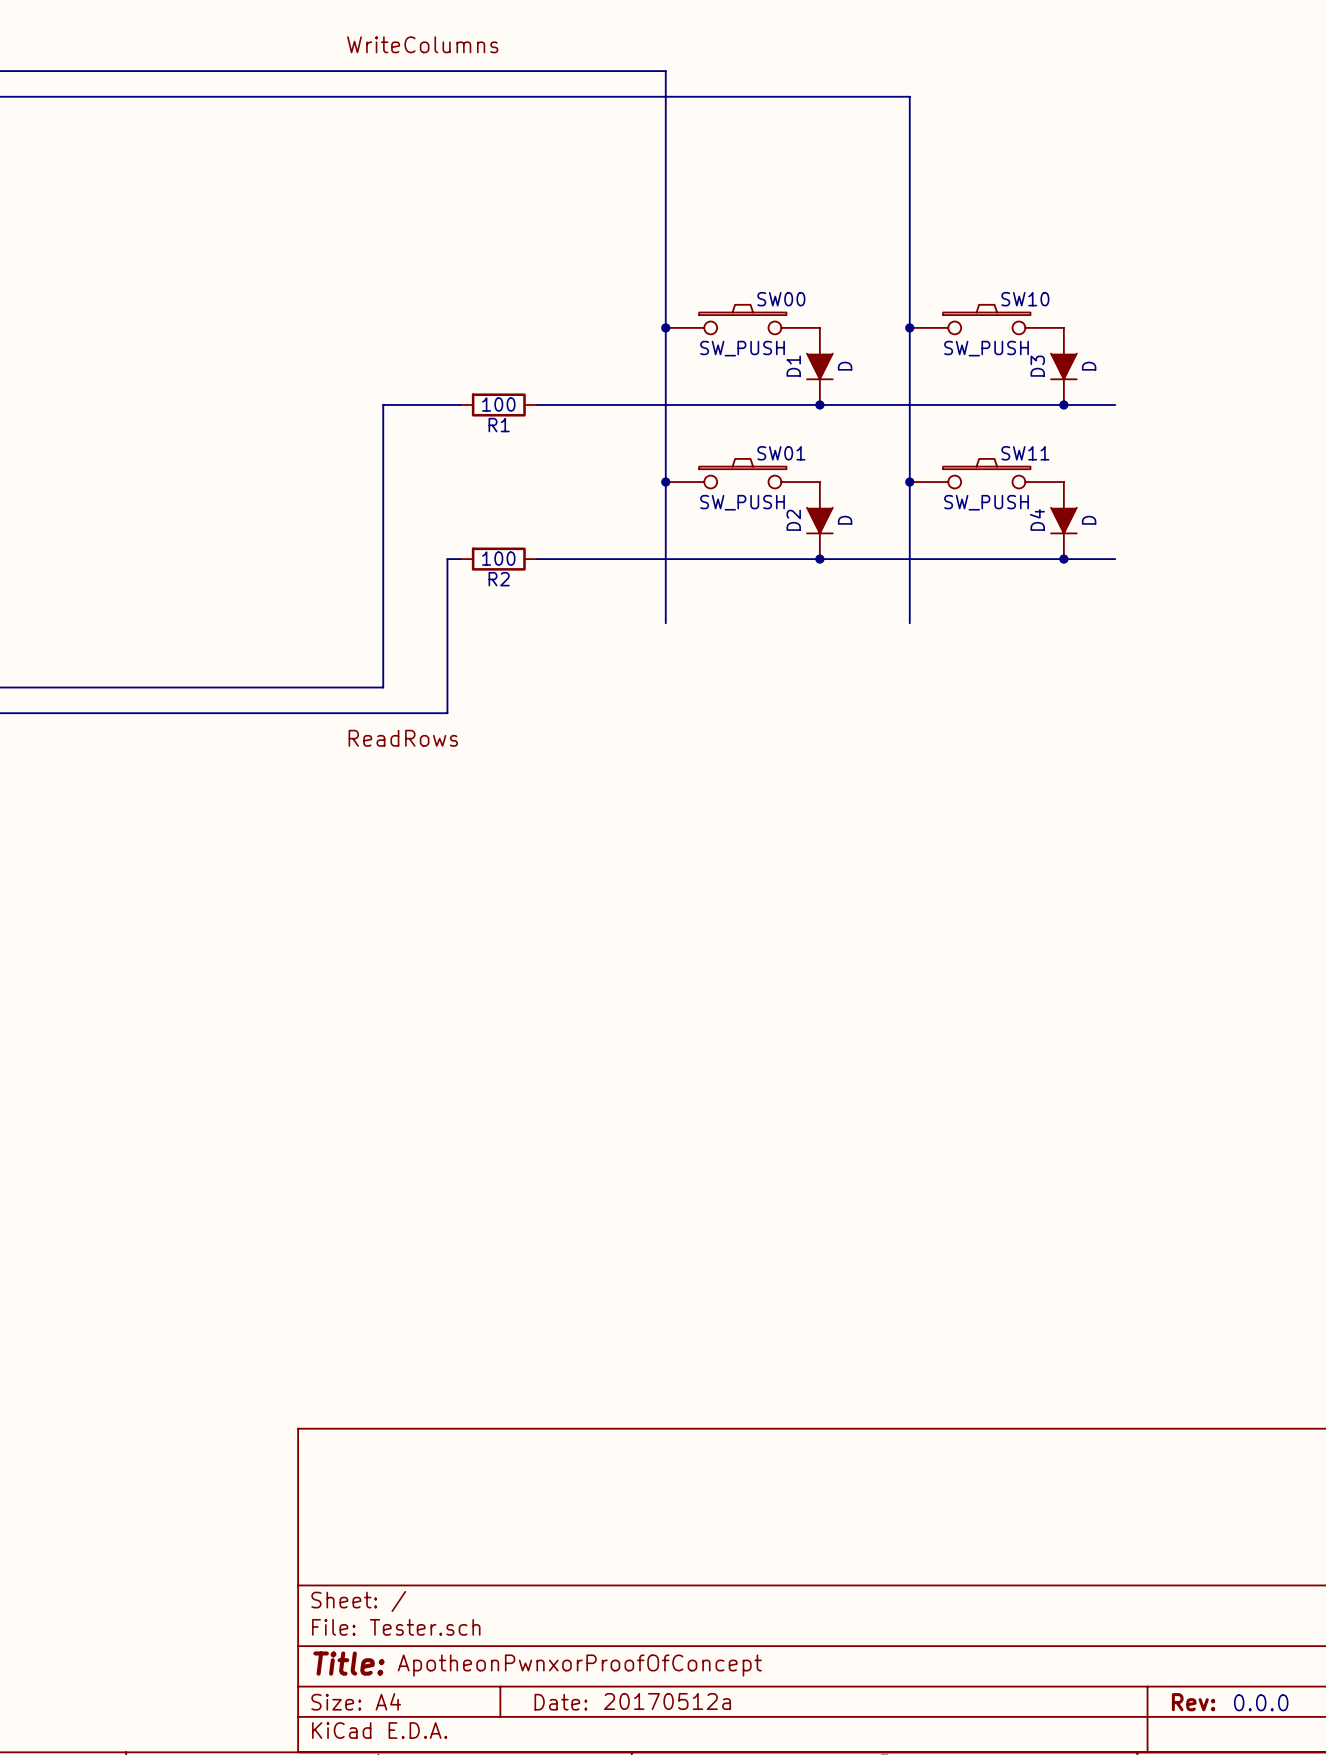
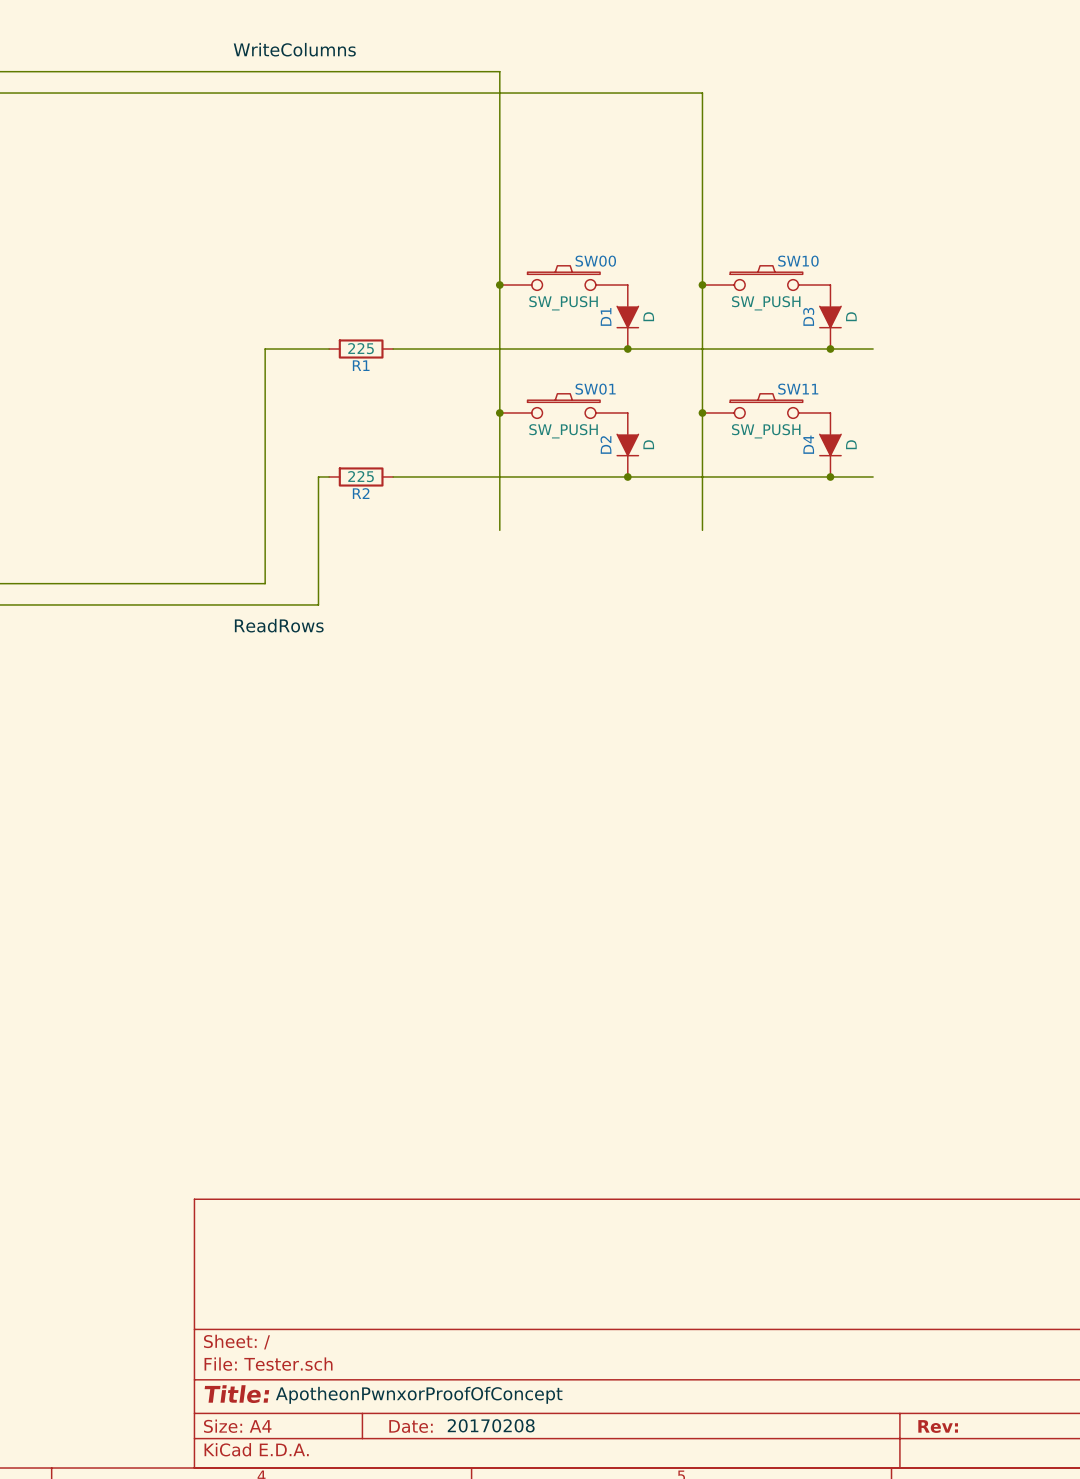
R1 value: 100 (498, 404) -> 225 (361, 348)
R2 value: 100 (498, 558) -> 225 (361, 476)
label: 20170512a (667, 1701) -> 20170208 (491, 1425)
text: 0.0.0 (1261, 1702) -> none

